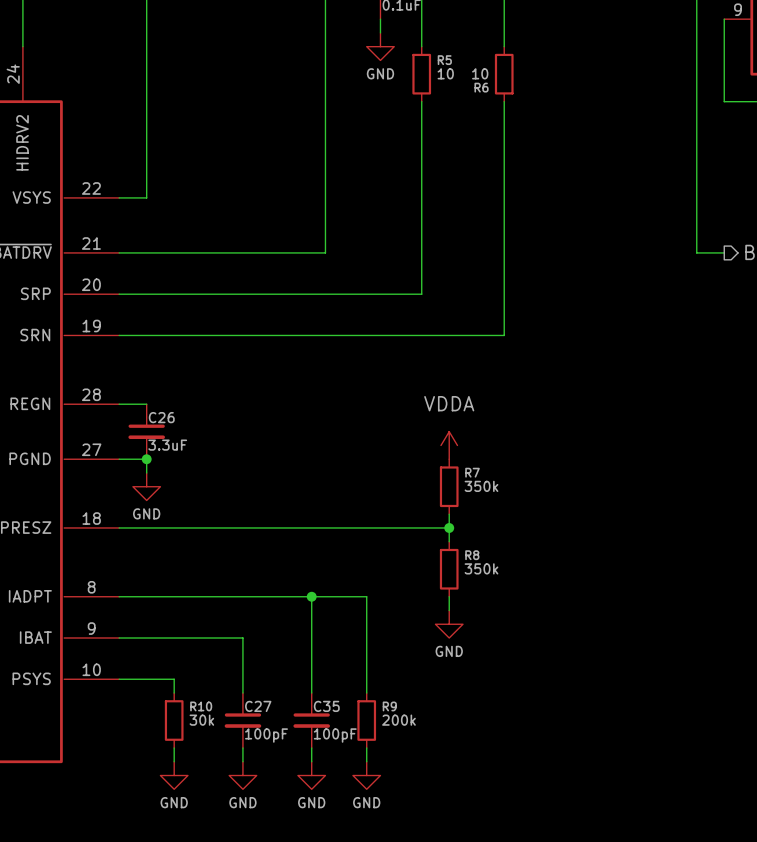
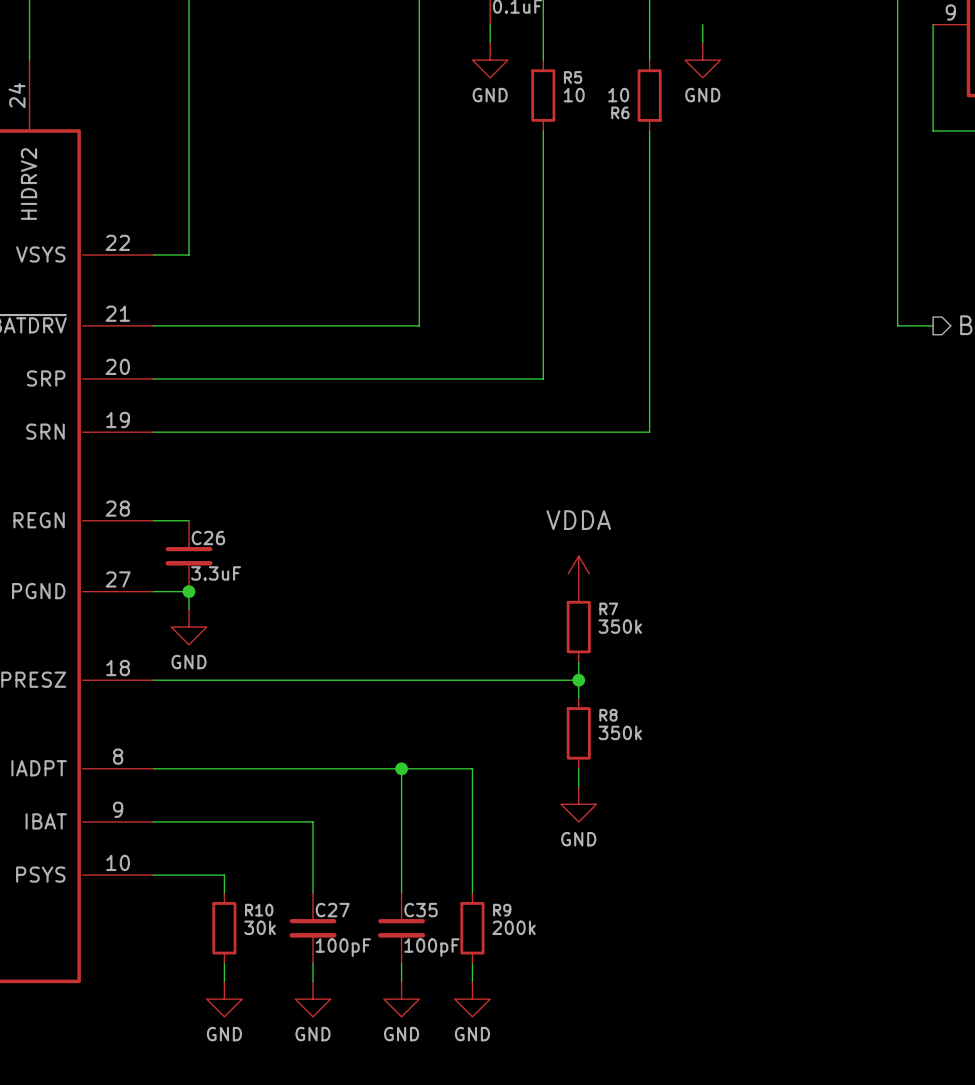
wire: none -> (702, 24) (702, 42)
power symbol: none -> GND (702, 60)

